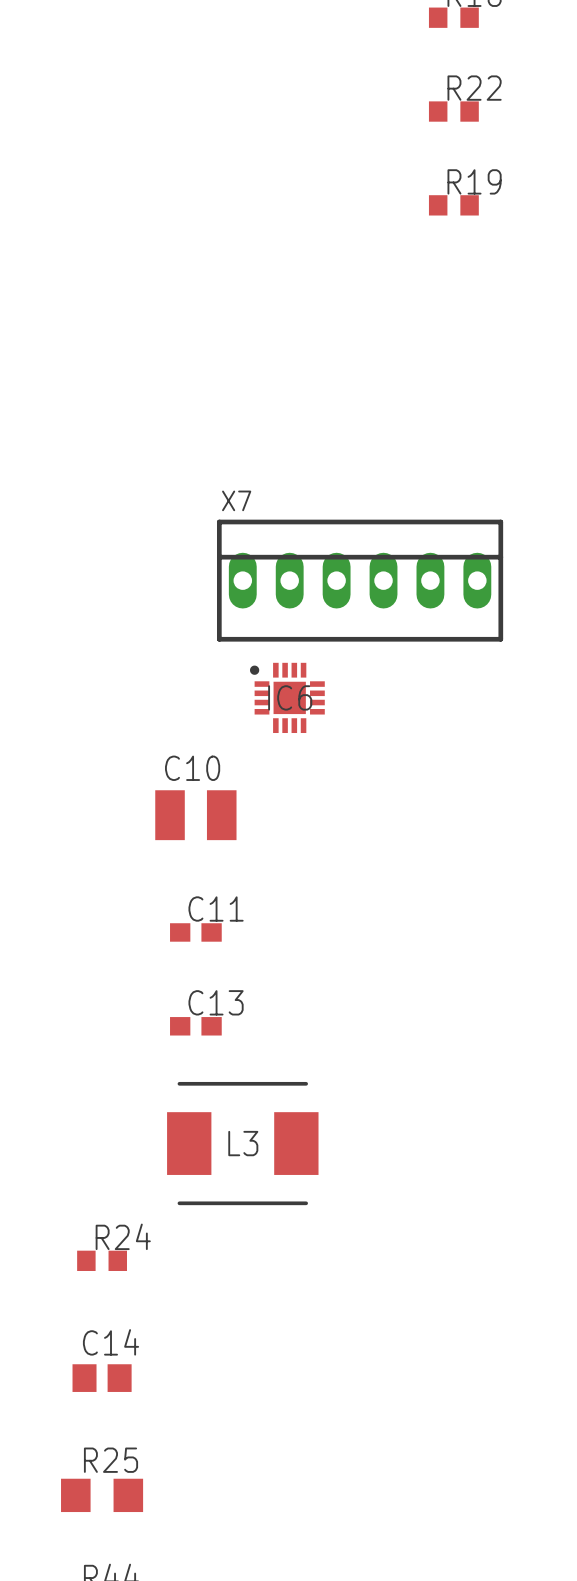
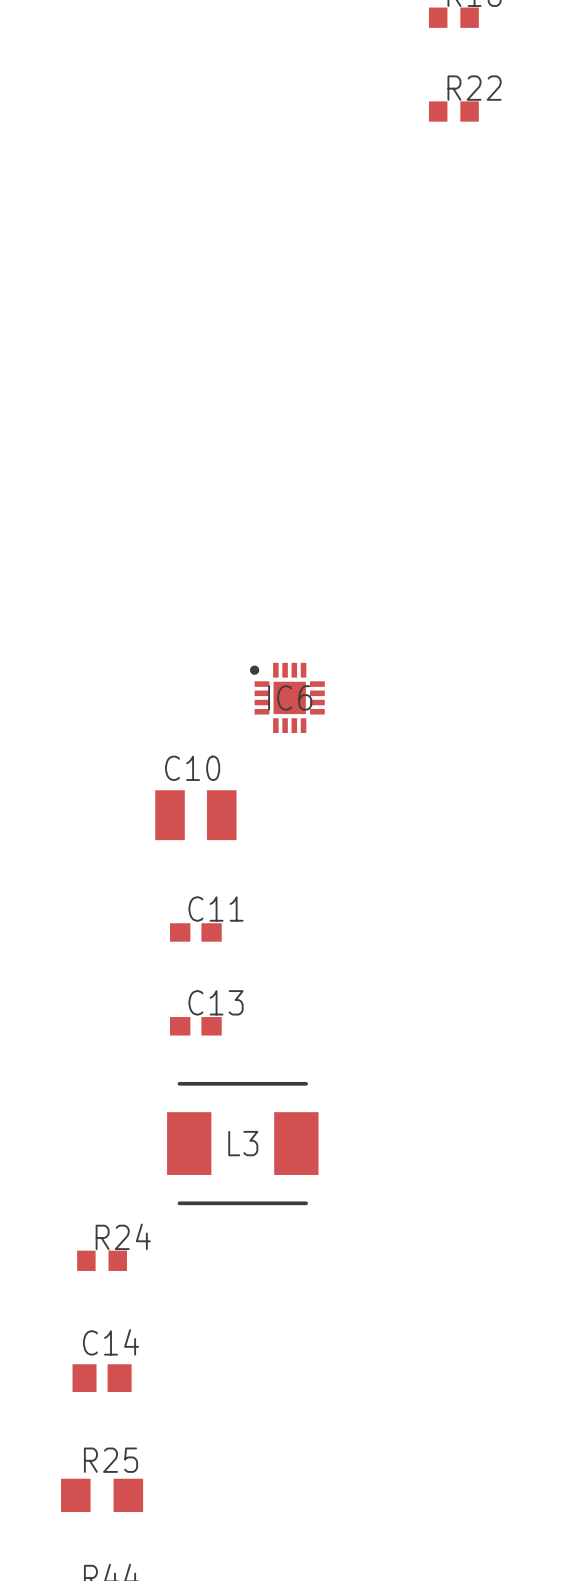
R19: (453, 205) -> none
X7: (360, 580) -> none

